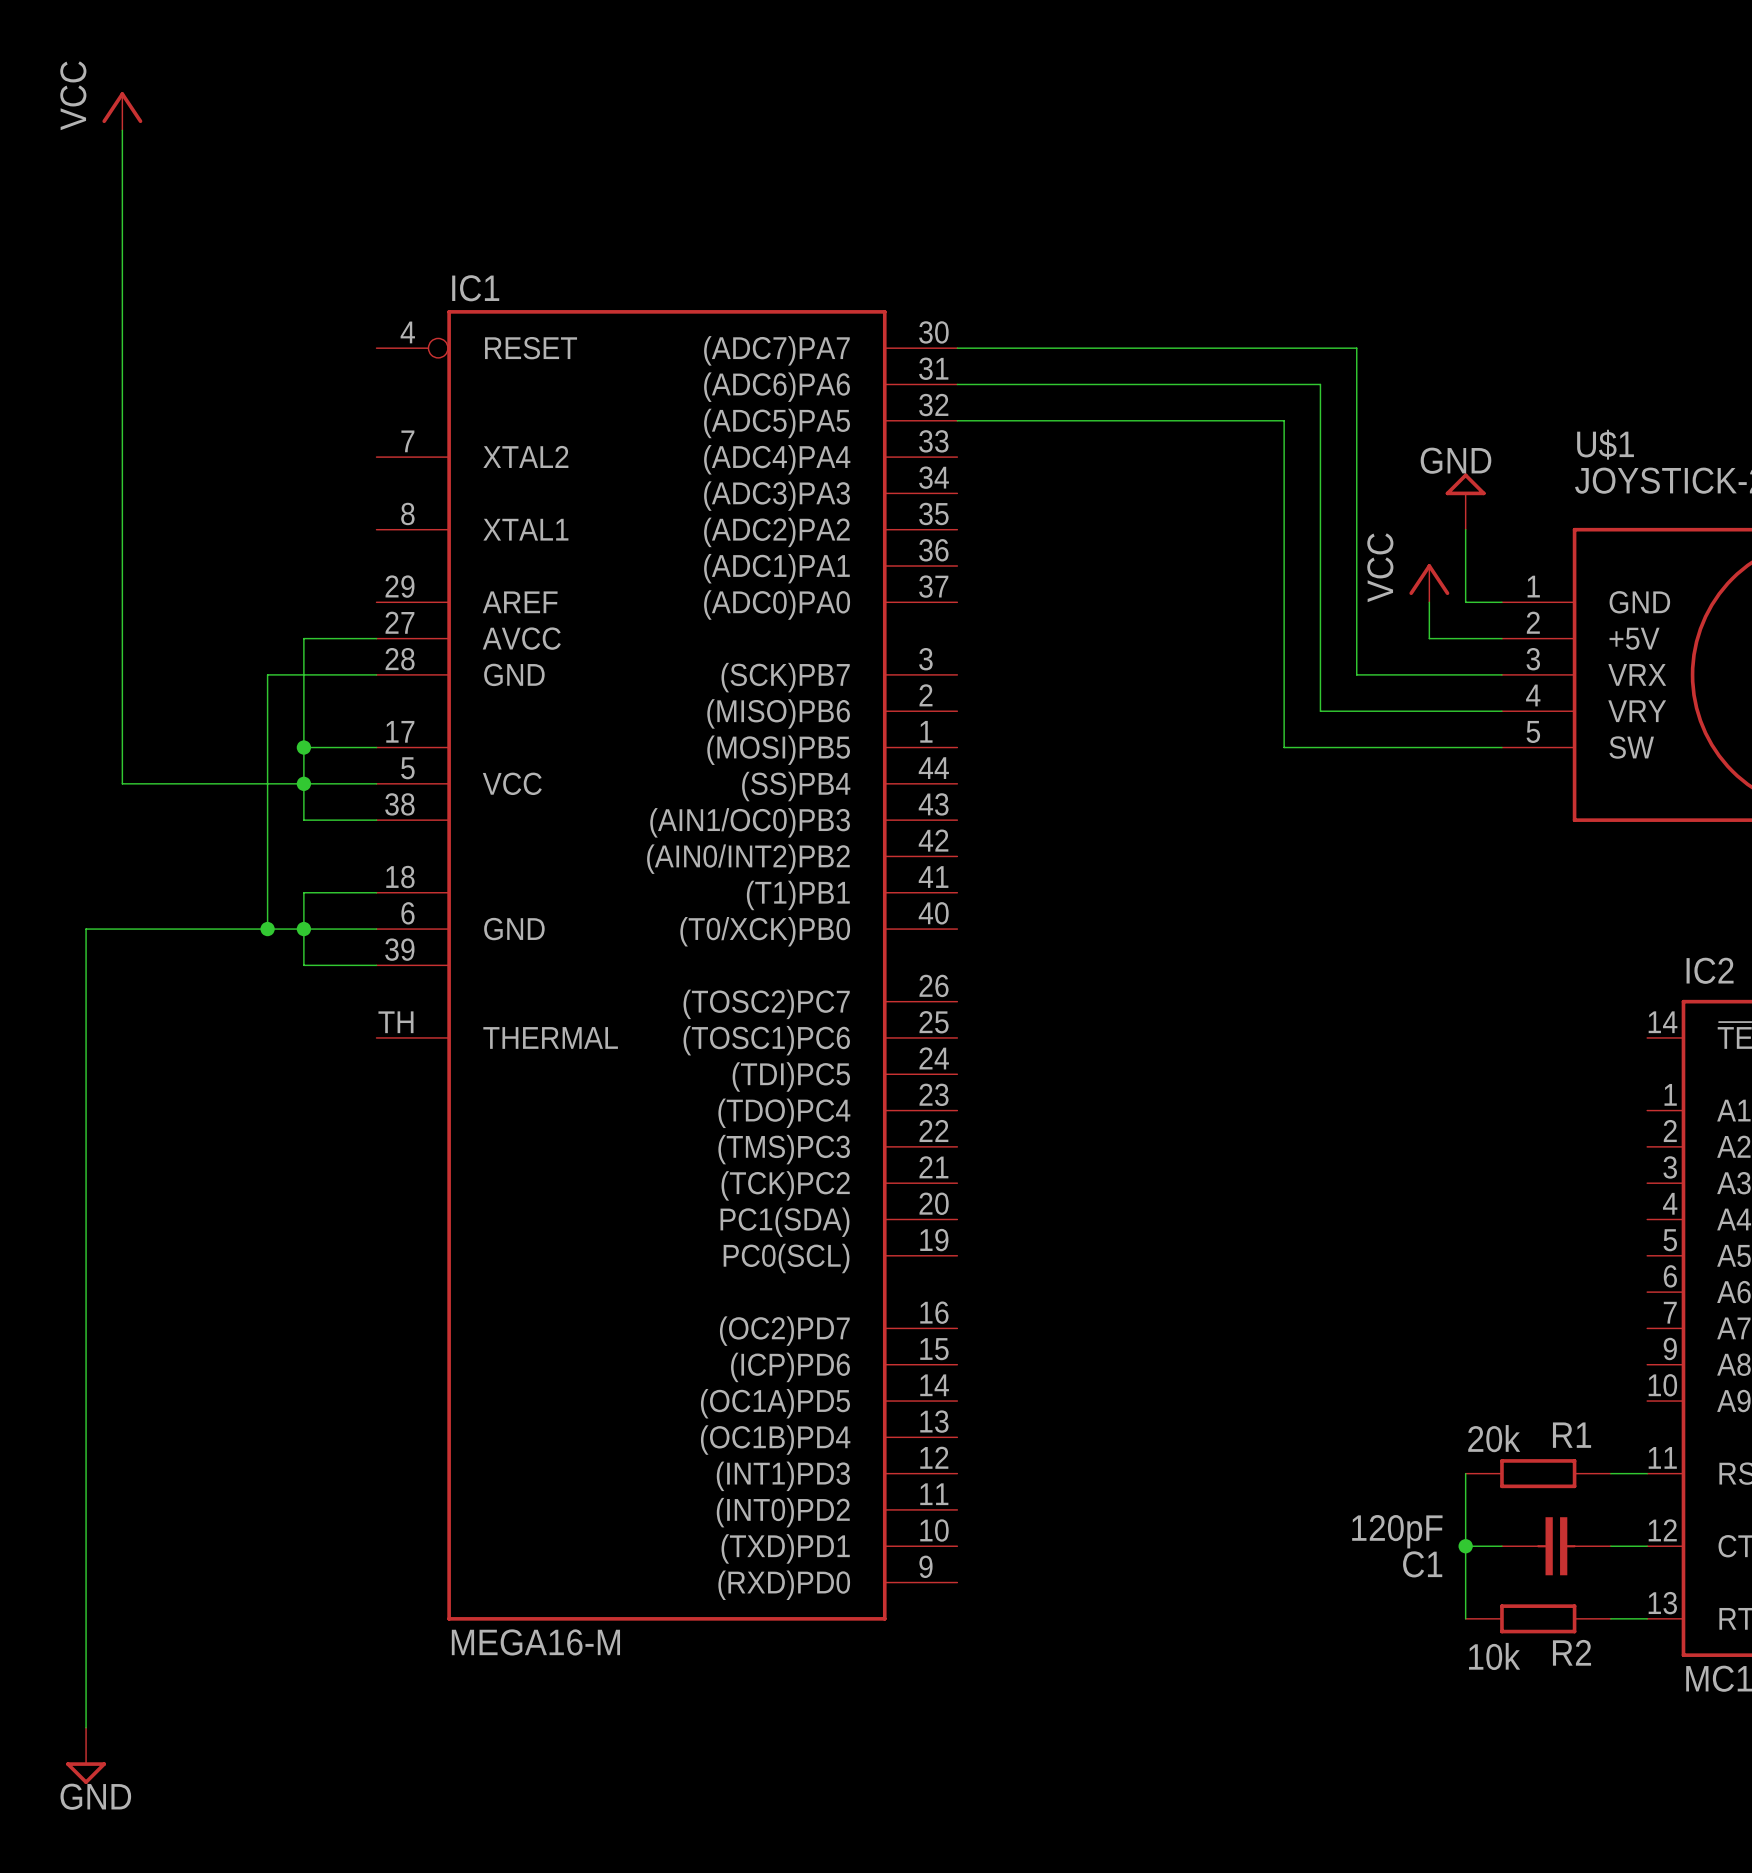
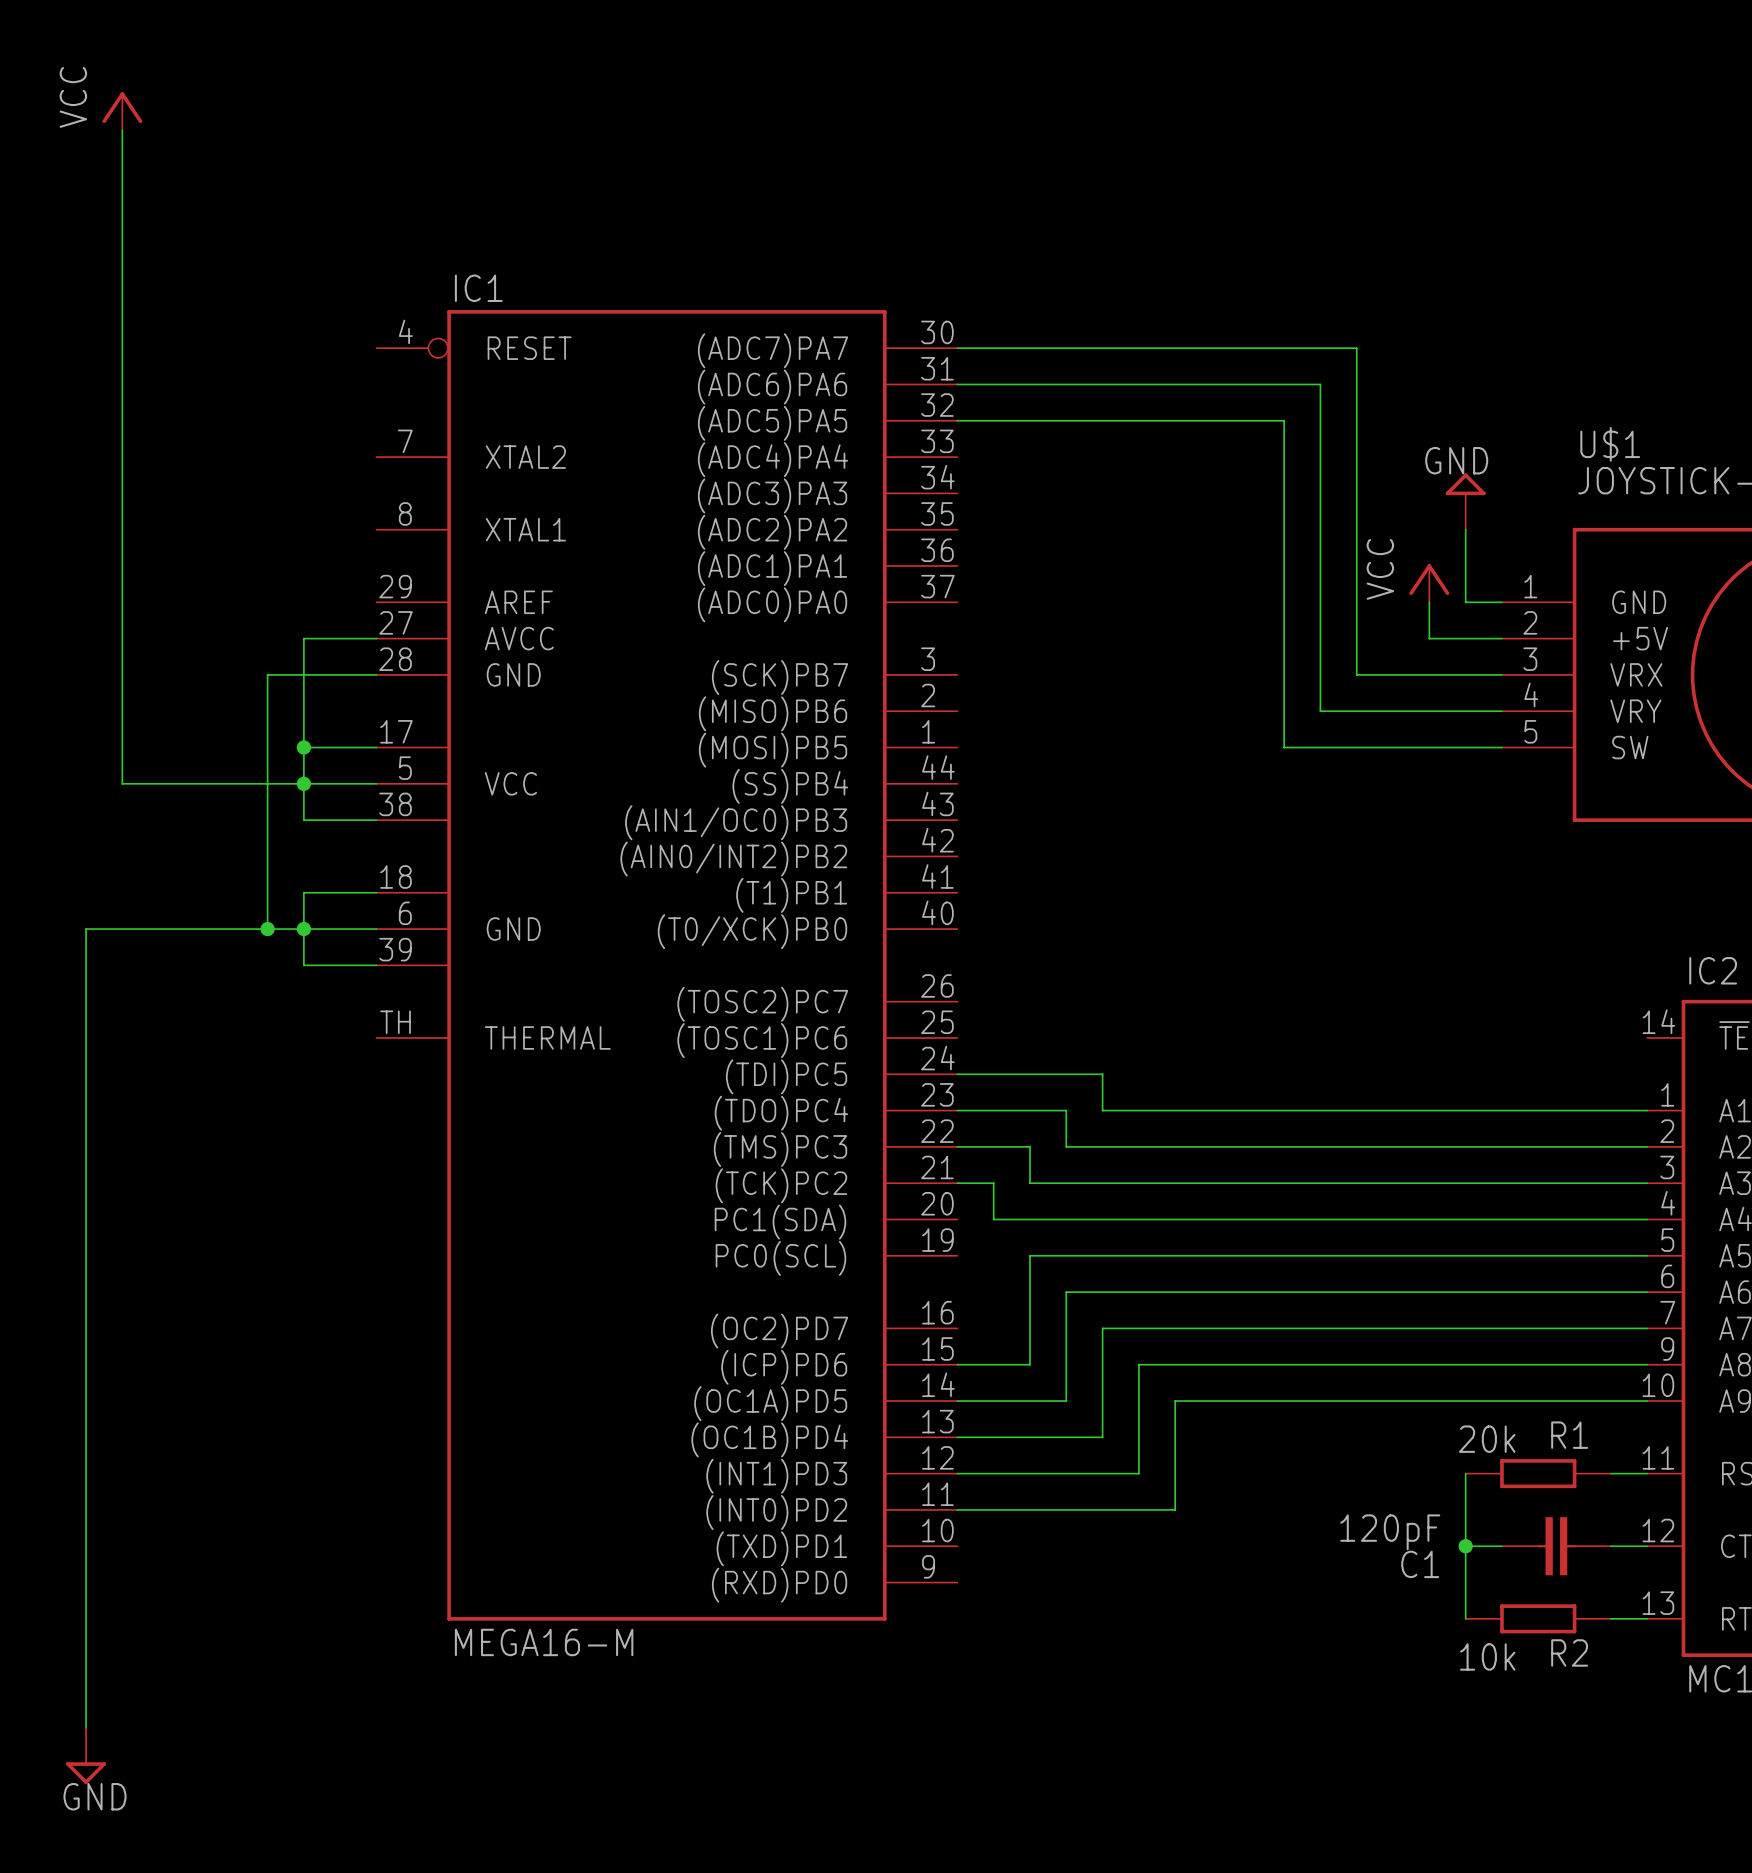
wire: none -> (957, 1074) (1102, 1074) (1102, 1110) (1647, 1110)
wire: none -> (957, 1110) (1066, 1110) (1066, 1146) (1647, 1146)
wire: none -> (957, 1146) (1029, 1146) (1029, 1183) (1647, 1183)
wire: none -> (957, 1183) (993, 1183) (993, 1219) (1647, 1219)
wire: none -> (1647, 1255) (1029, 1255) (1029, 1364) (957, 1364)
wire: none -> (1647, 1292) (1066, 1292) (1066, 1401) (957, 1401)
wire: none -> (1647, 1328) (1102, 1328) (1102, 1437) (957, 1437)
wire: none -> (1647, 1364) (1138, 1364) (1138, 1473) (957, 1473)
wire: none -> (1647, 1401) (1175, 1401) (1175, 1509) (957, 1509)

